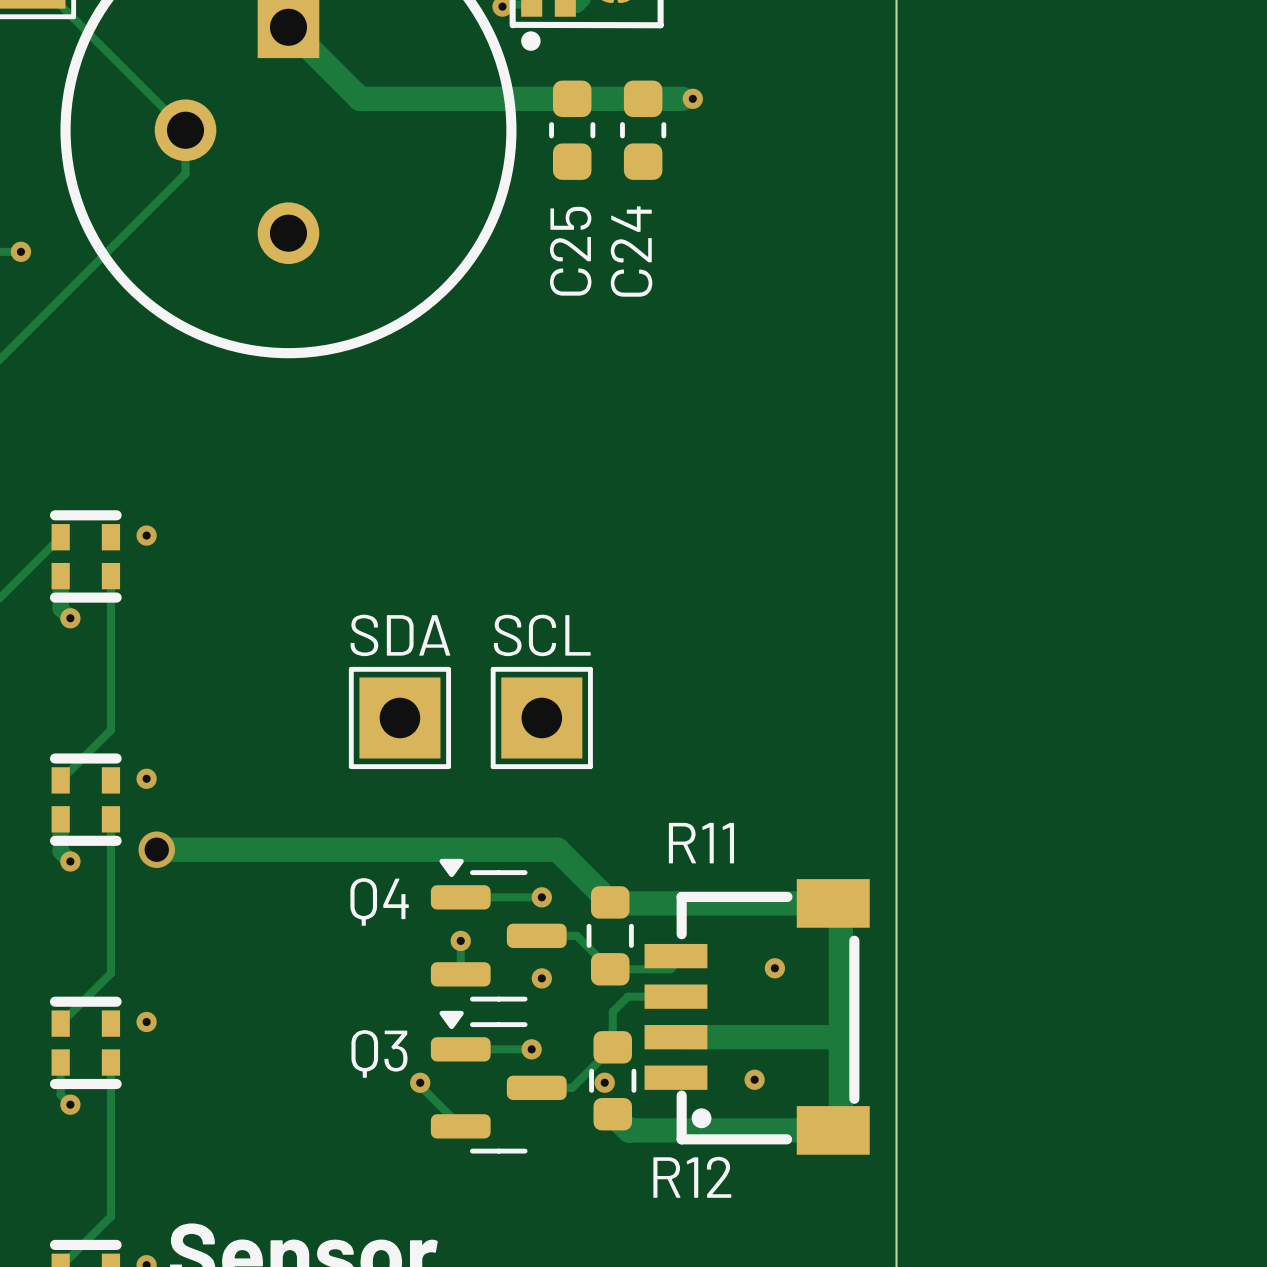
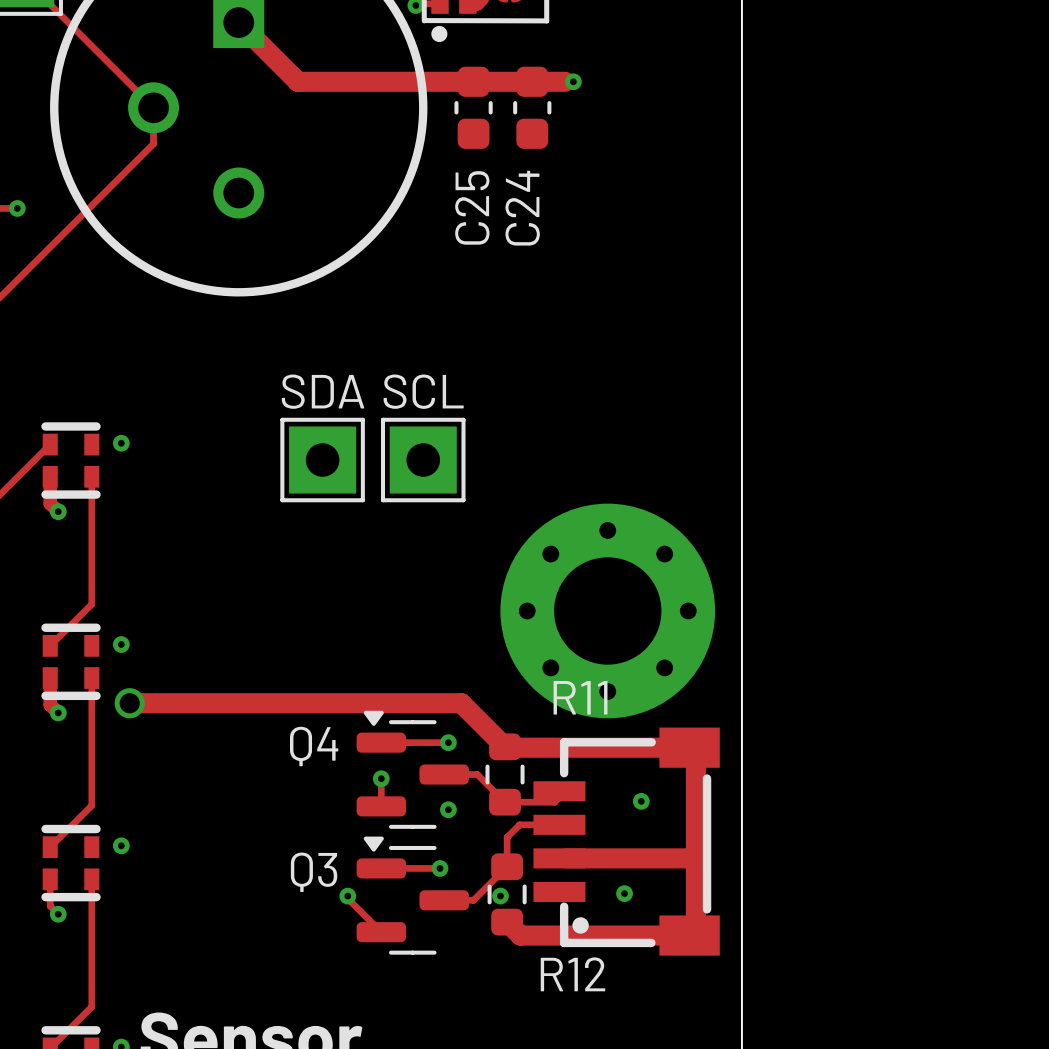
part position: (399, 717) -> (322, 460)
part position: (541, 717) -> (423, 460)
part: none -> (607, 610)

